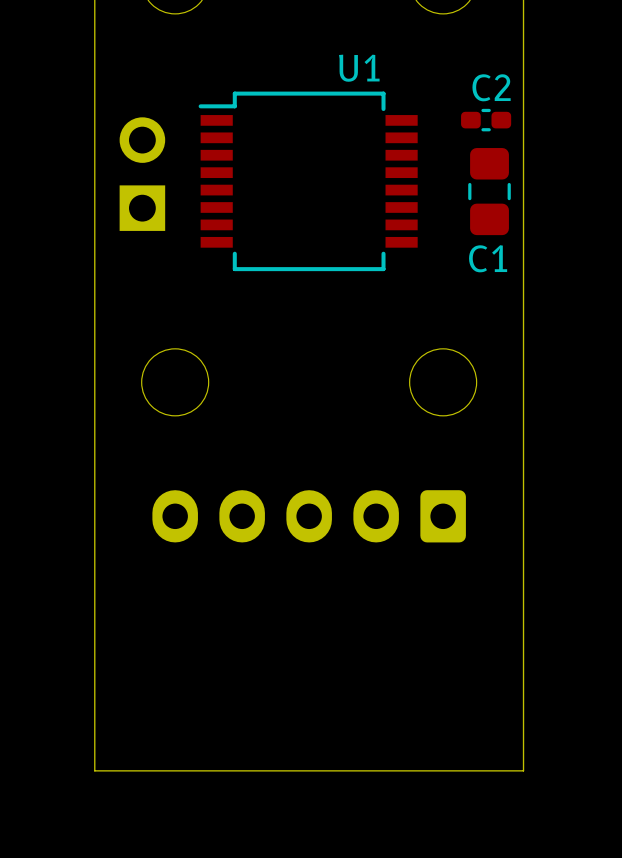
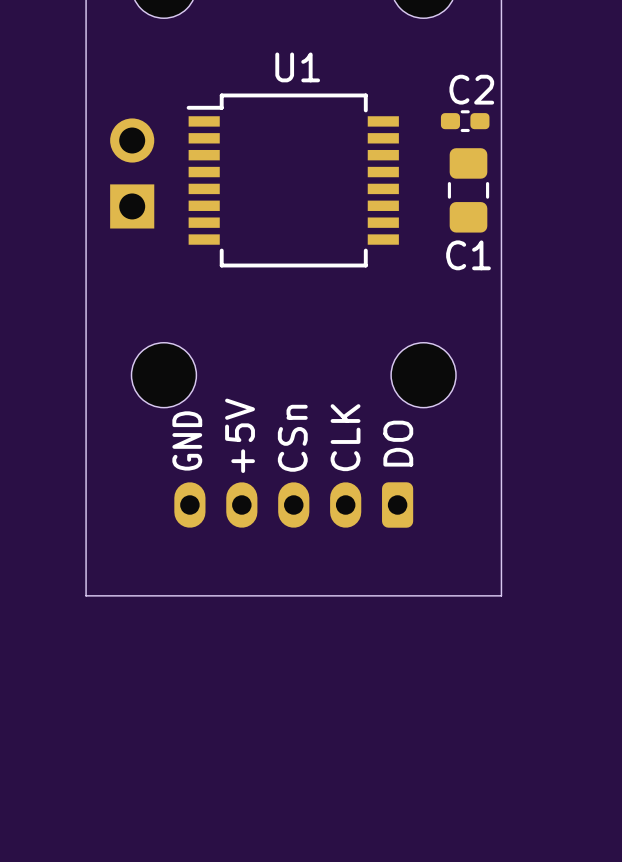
U1 name position: U1 (359, 68) -> U1 (297, 67)
text: none -> +5V (240, 435)
text: none -> CLK (345, 437)
text: none -> CSn (292, 438)
text: none -> GND (187, 440)
text: none -> DO (398, 443)
part footprint: [152, 490, 466, 543] -> [174, 482, 414, 528]
board edge: (94, 610) (94, 770) (523, 770) (523, 610) -> (86, 595) (501, 595)

